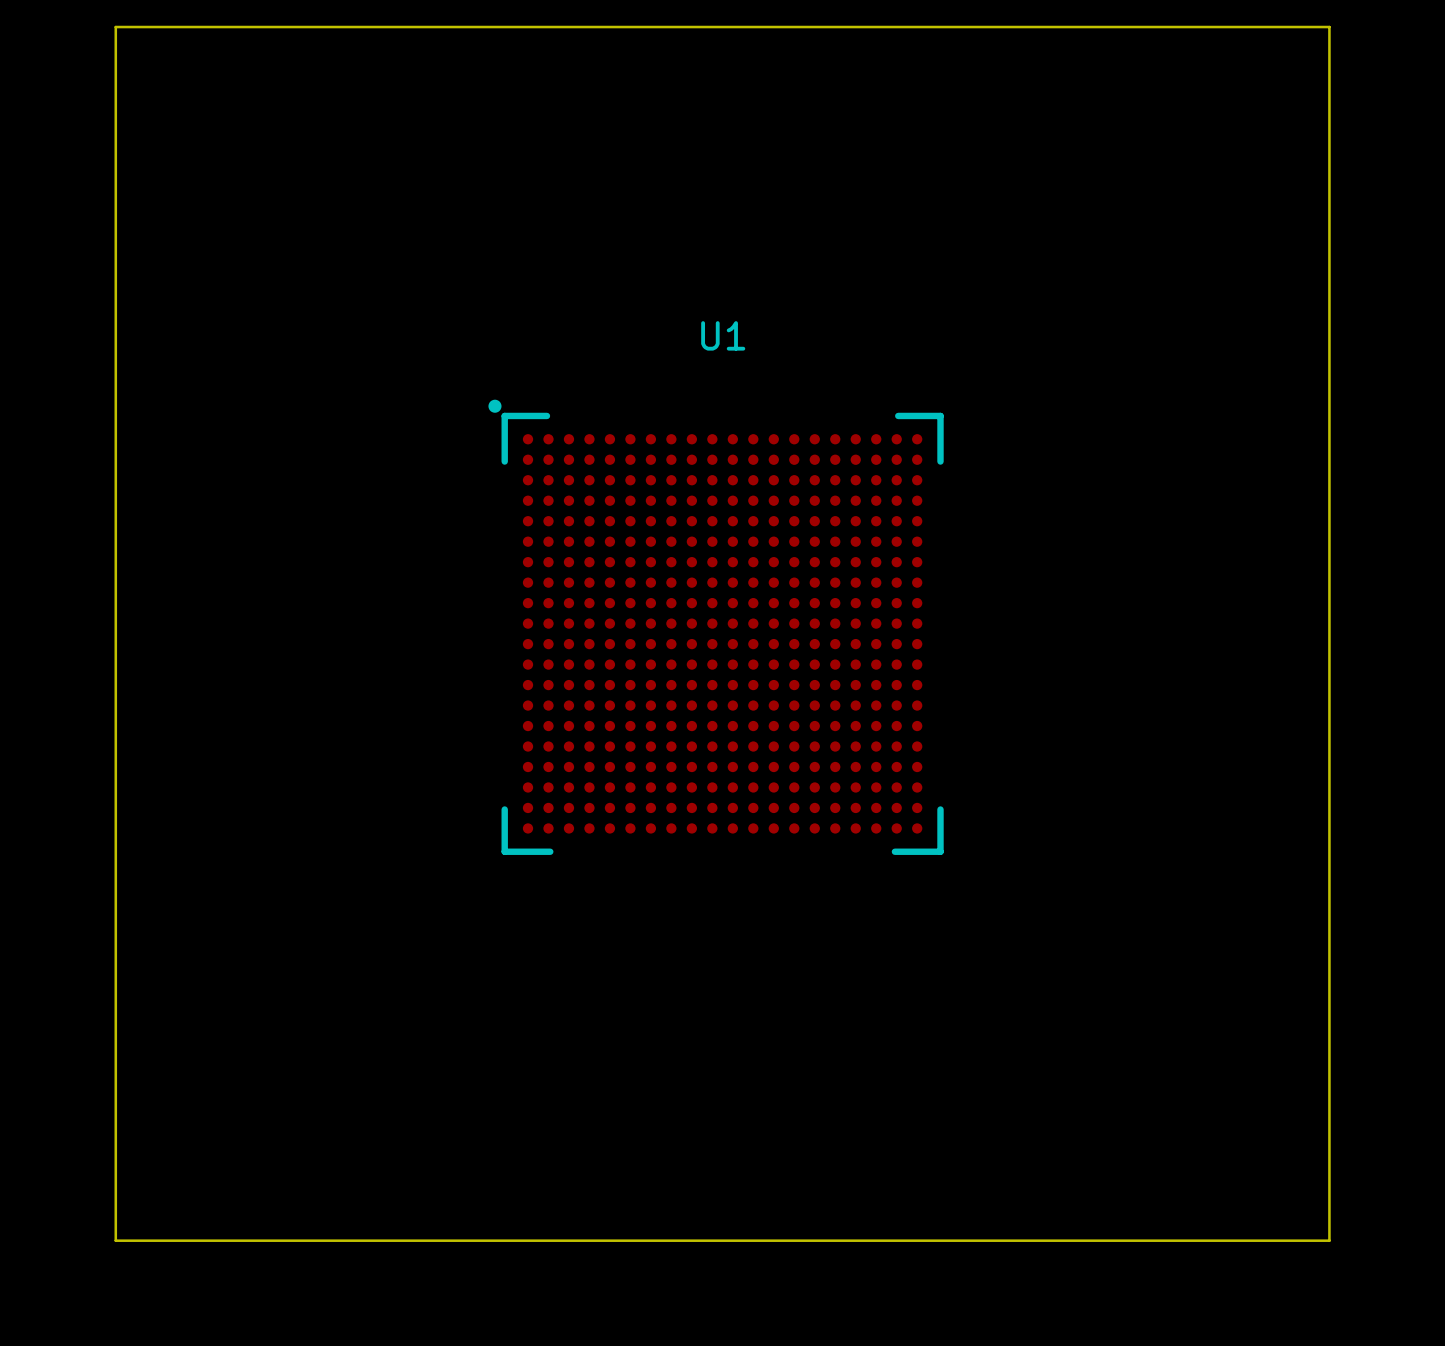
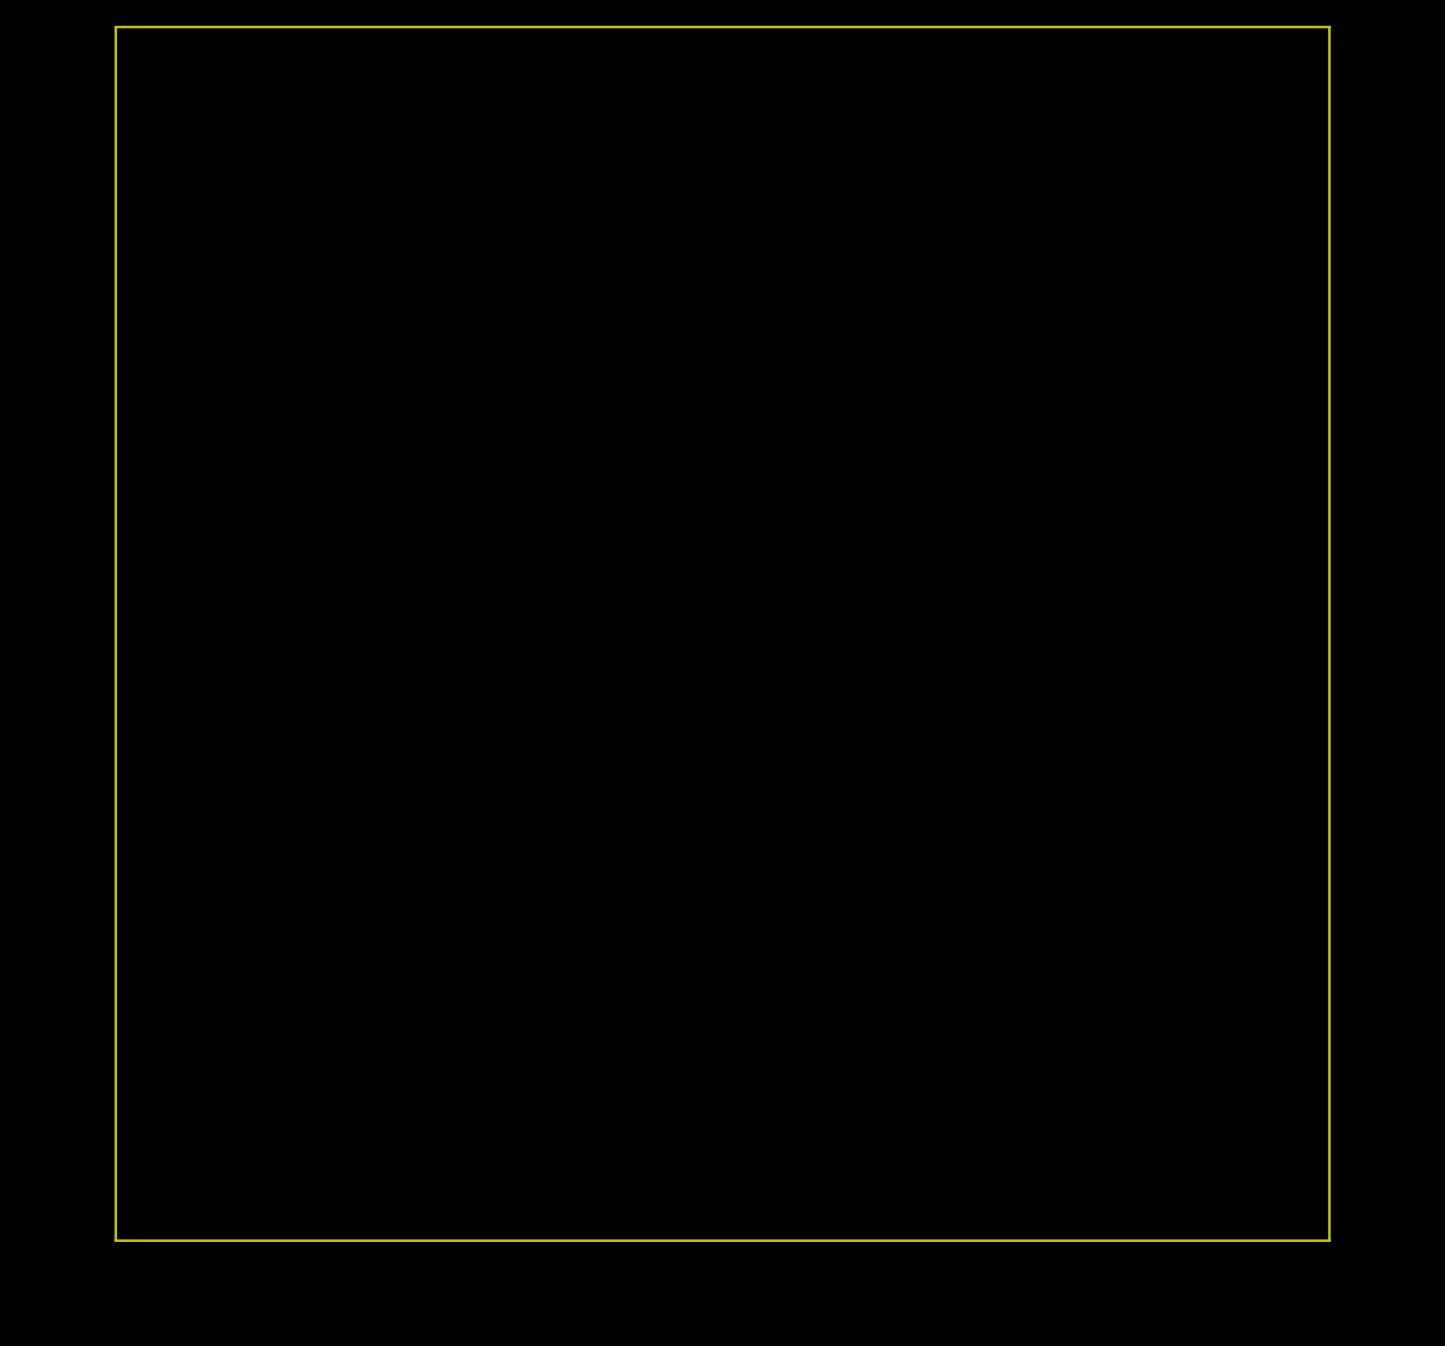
U1: (716, 627) -> none

